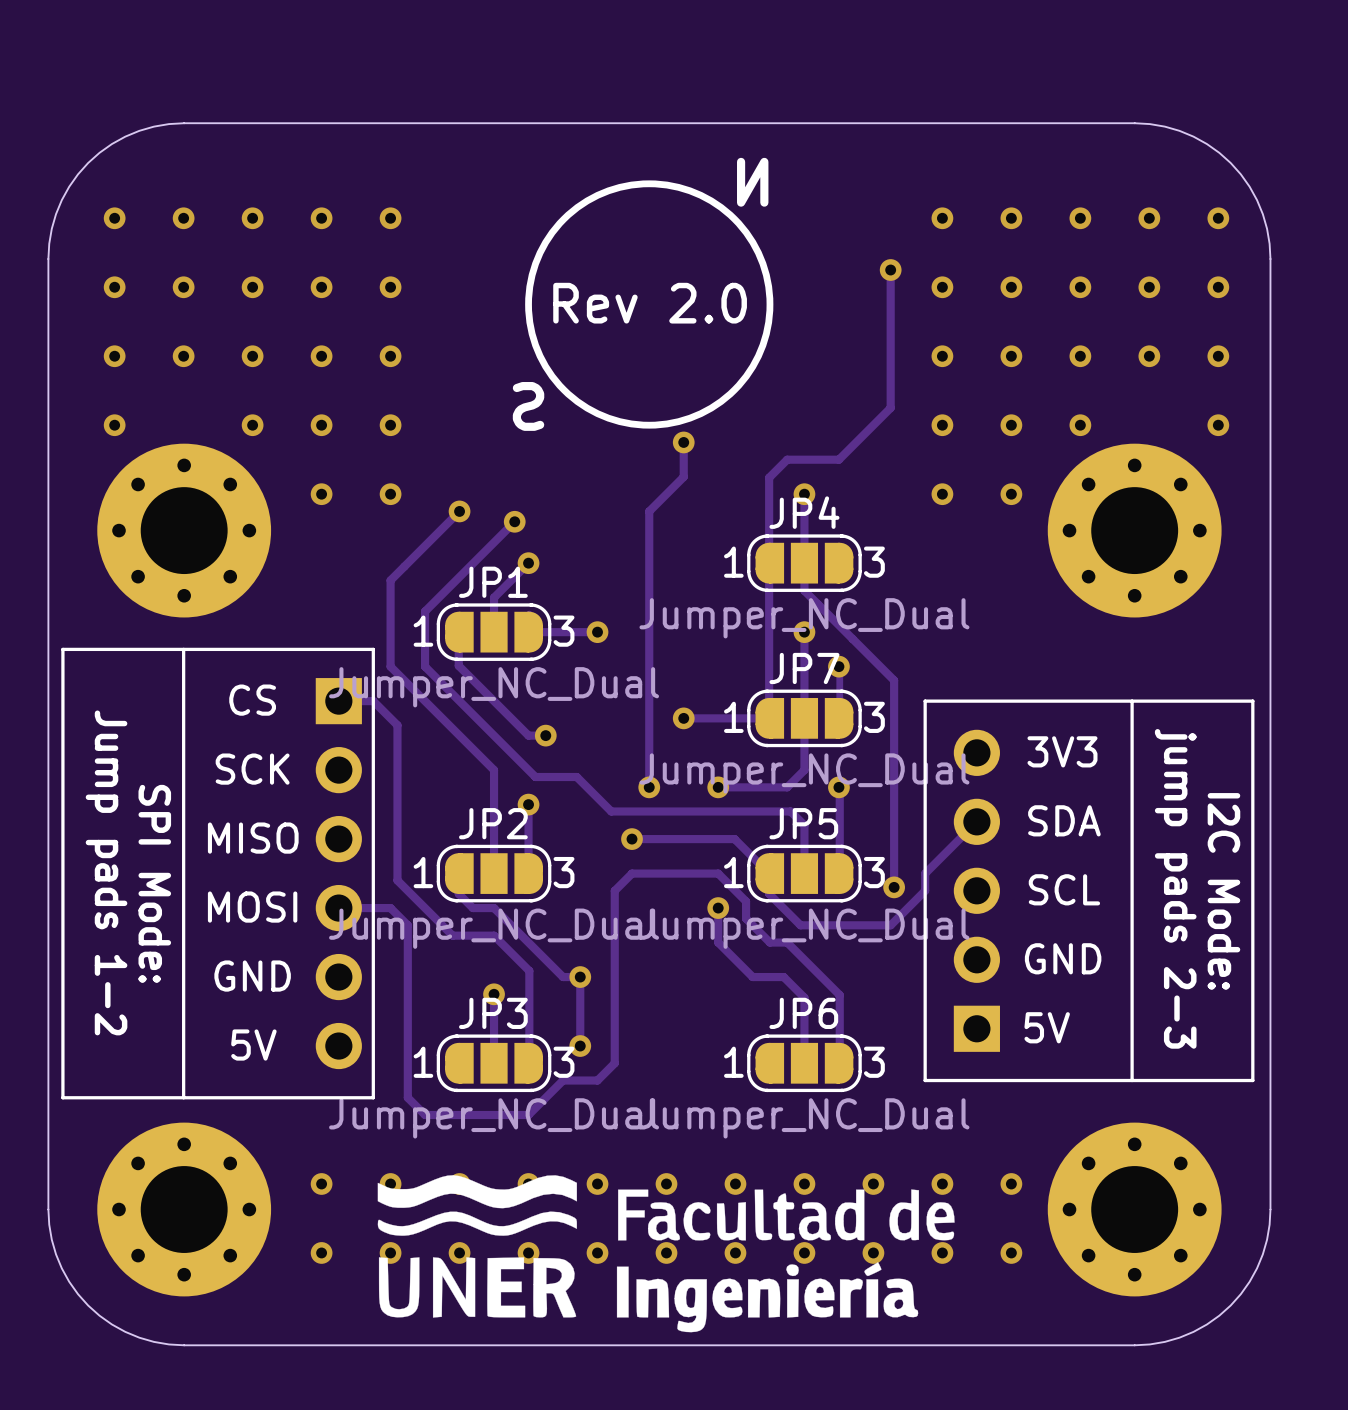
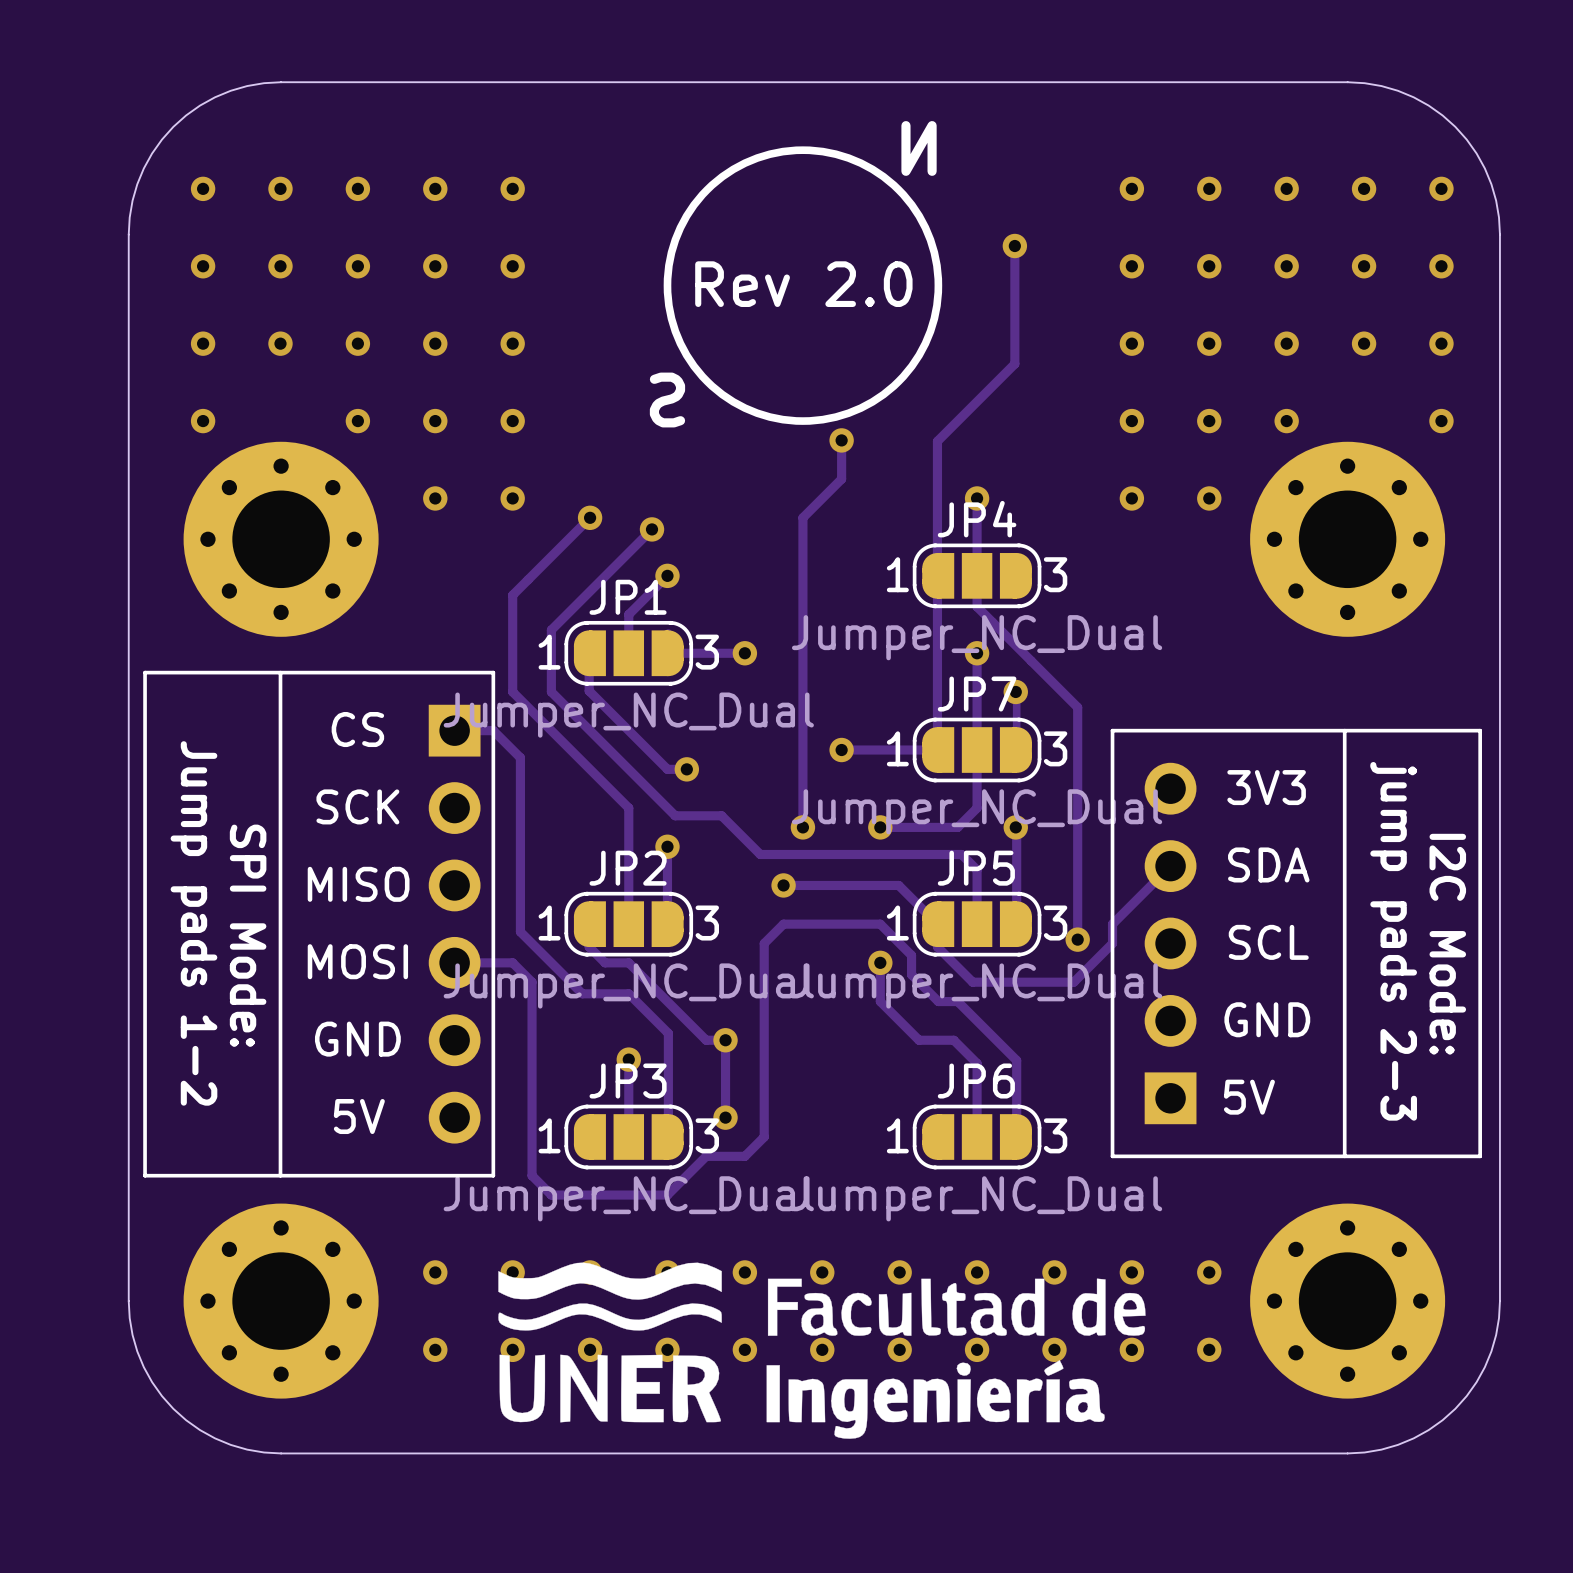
track: (890, 270) (890, 407) (838, 459) (787, 459) (769, 477) -> (1014, 246) (1014, 363) (937, 441) (937, 480)
via position: (890, 270) -> (1014, 246)

